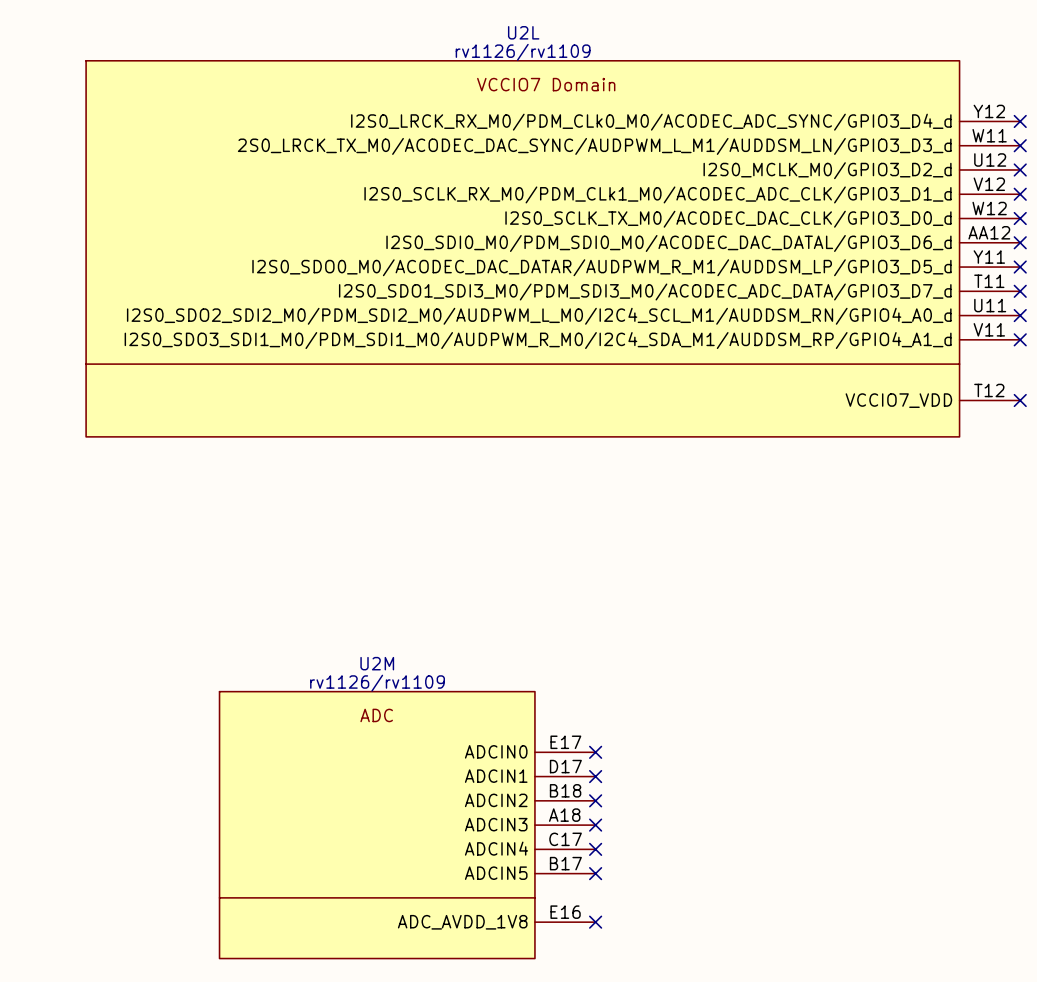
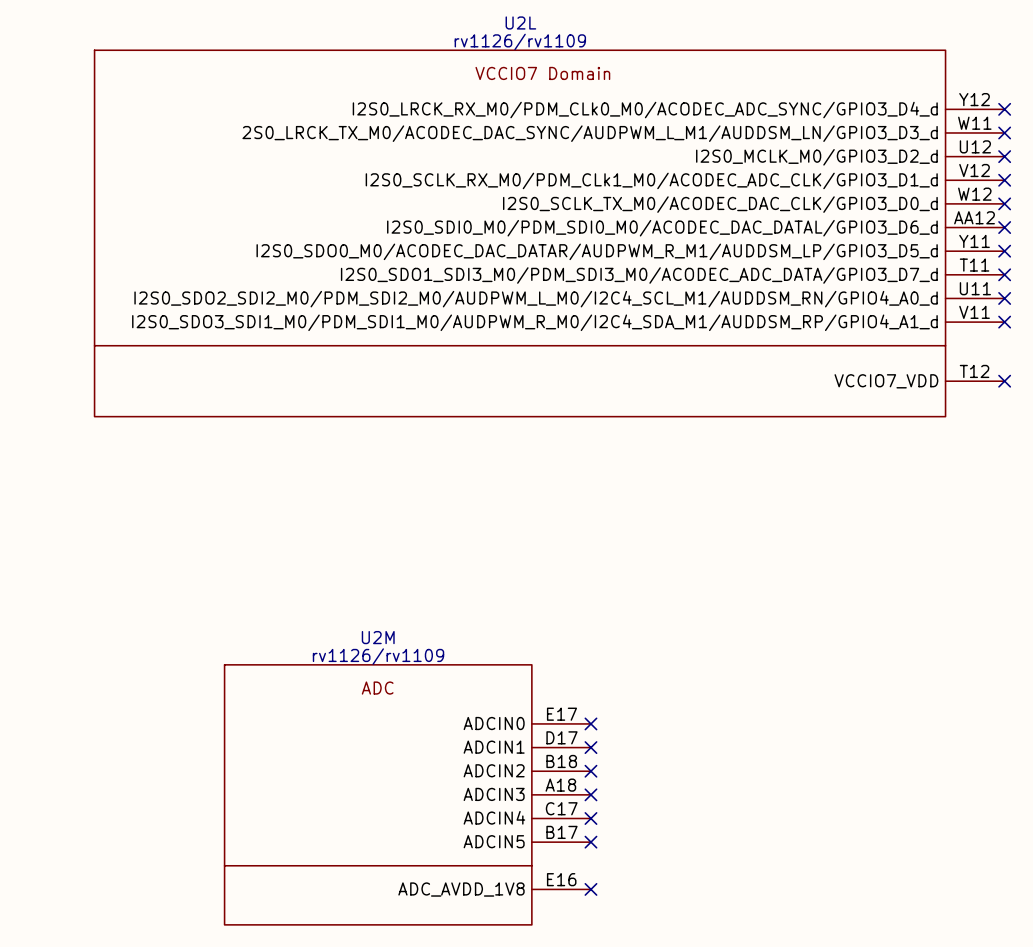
U2L symbol: [86, 60, 1021, 437] -> [94, 50, 1005, 417]
U2M symbol: [219, 691, 596, 959] -> [224, 664, 591, 925]

